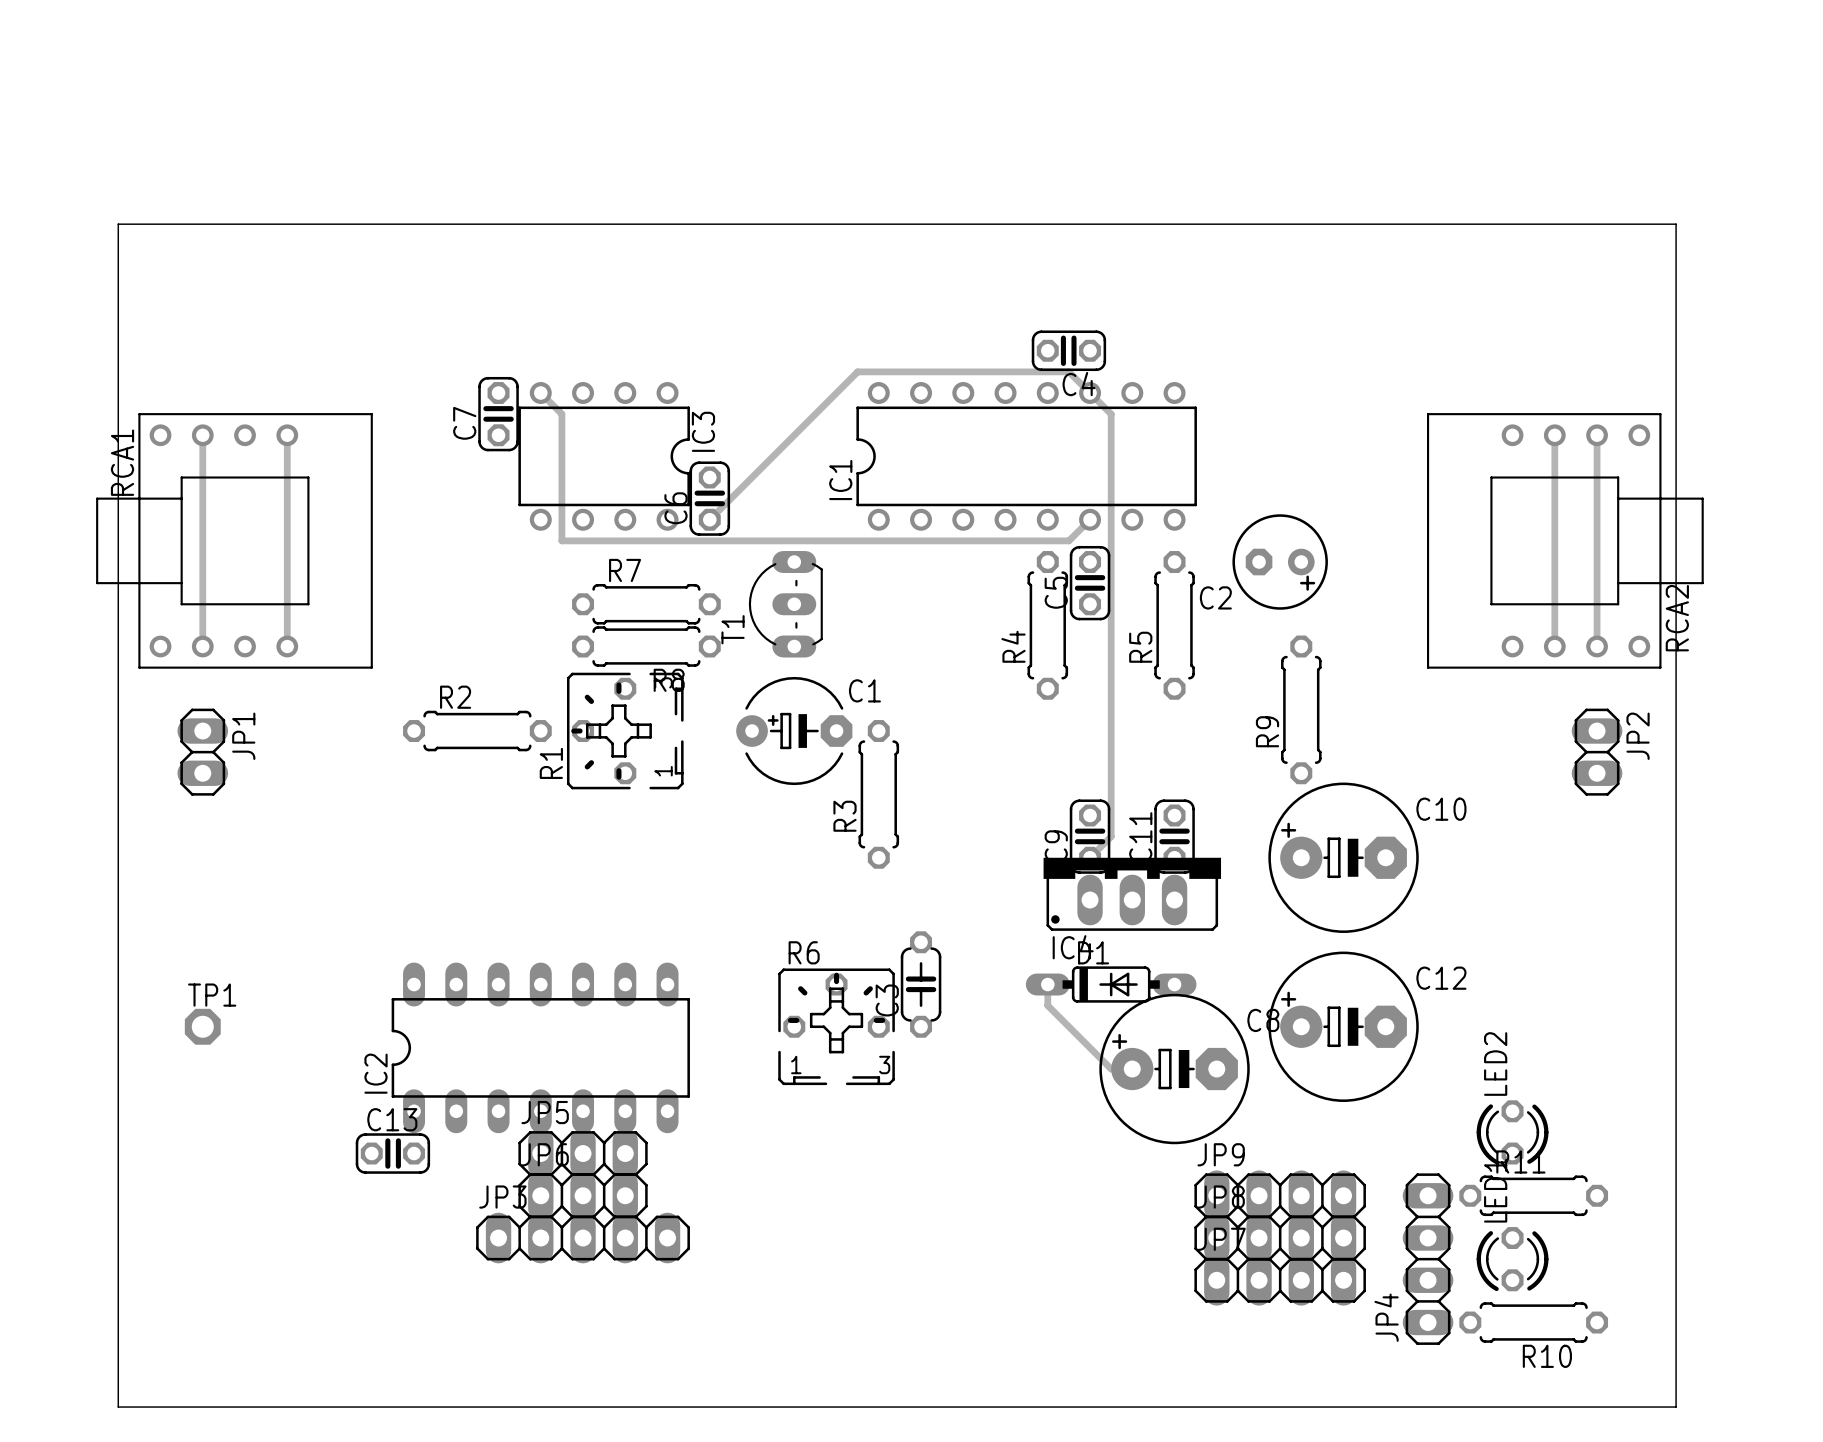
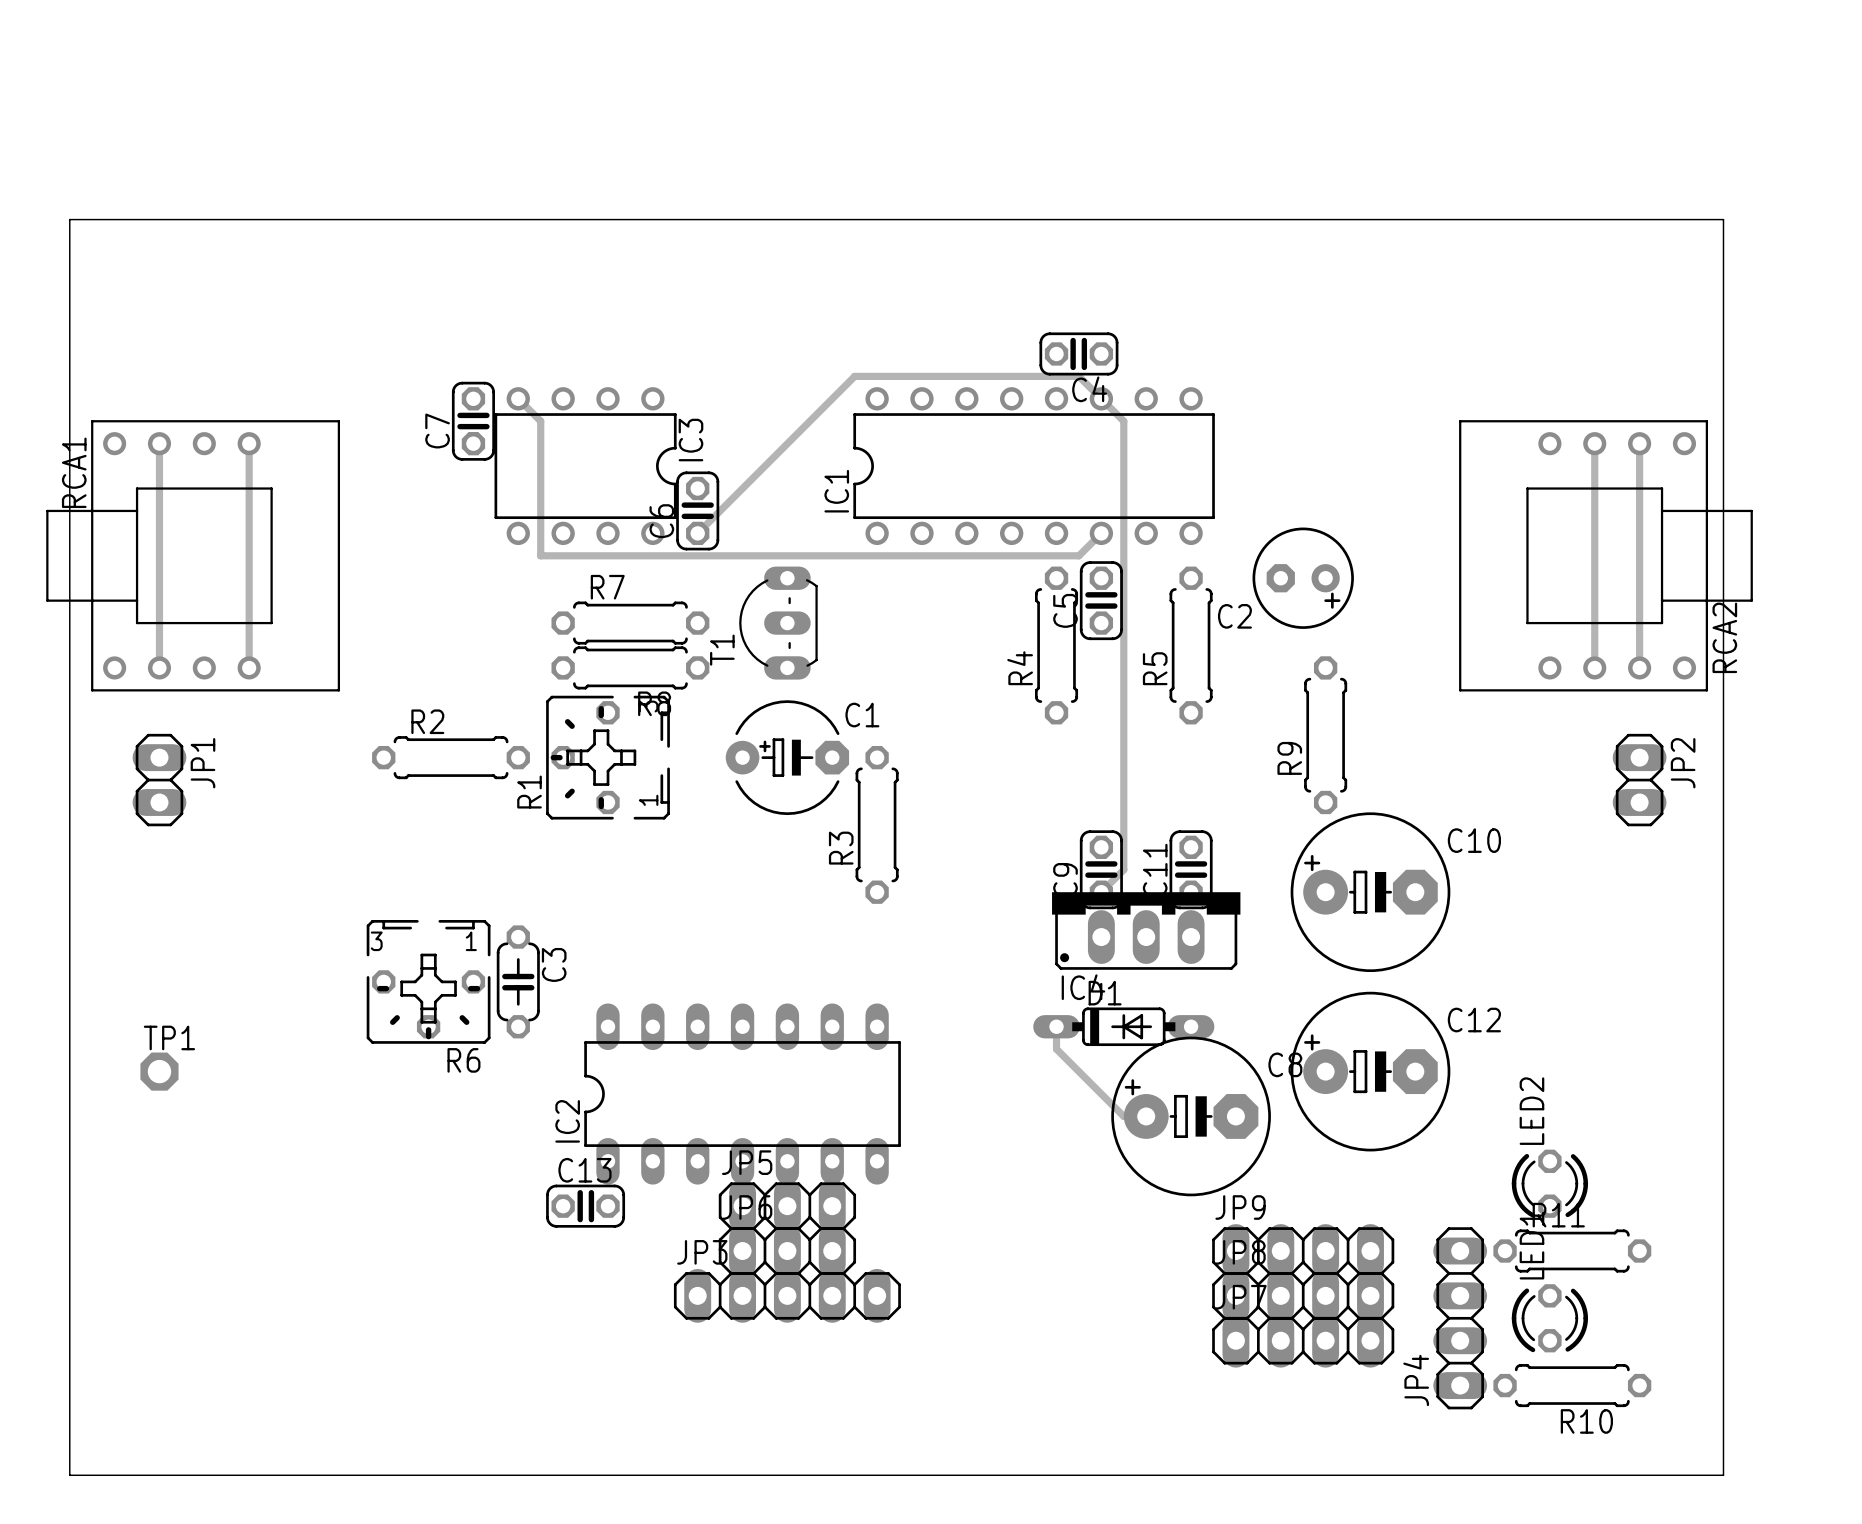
R6 name position: R6 (804, 952) -> R6 (463, 1060)
R6 footprint: [778, 968, 895, 1086] -> [366, 920, 491, 1044]
C3 rotation: 0° (921, 984) -> 180° (518, 981)
C3 position: (921, 984) -> (518, 981)
IC2 position: (540, 1047) -> (742, 1094)
C13 position: (392, 1153) -> (585, 1206)
JP5 position: (583, 1153) -> (787, 1206)
JP6 position: (583, 1195) -> (787, 1251)
JP3 position: (583, 1238) -> (787, 1295)

